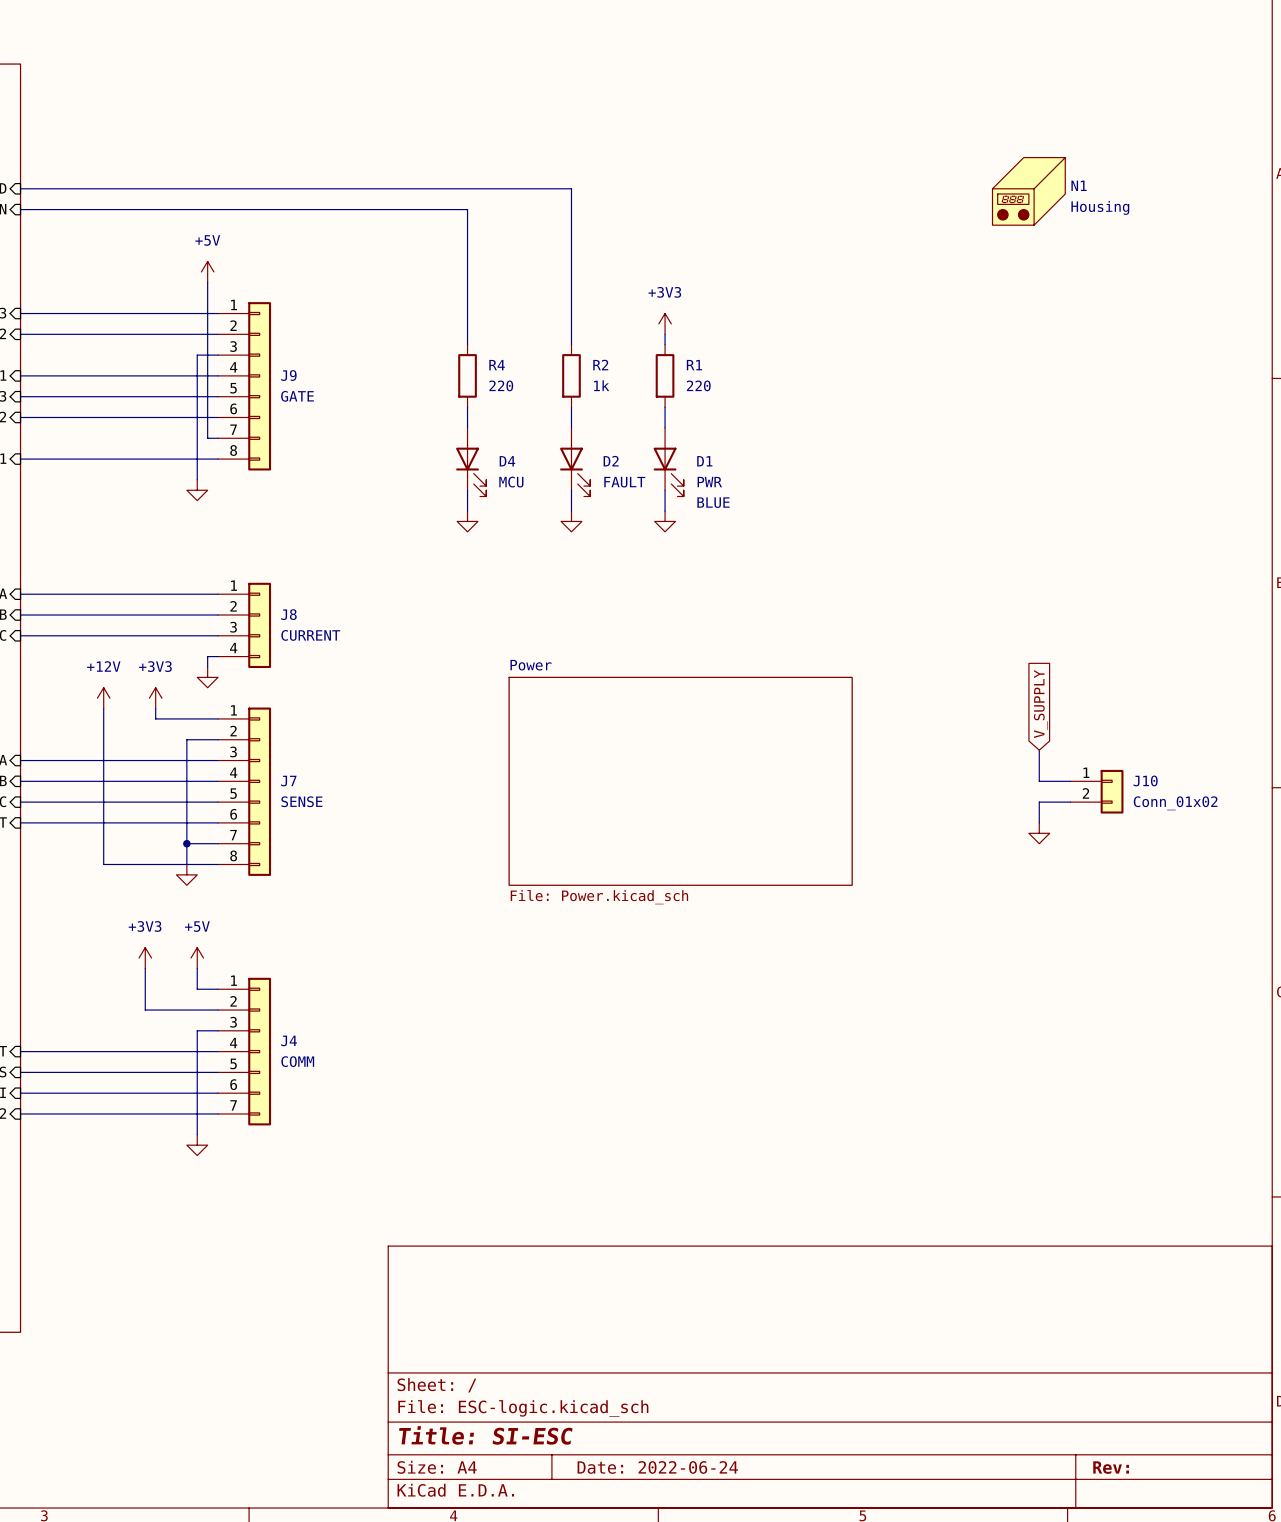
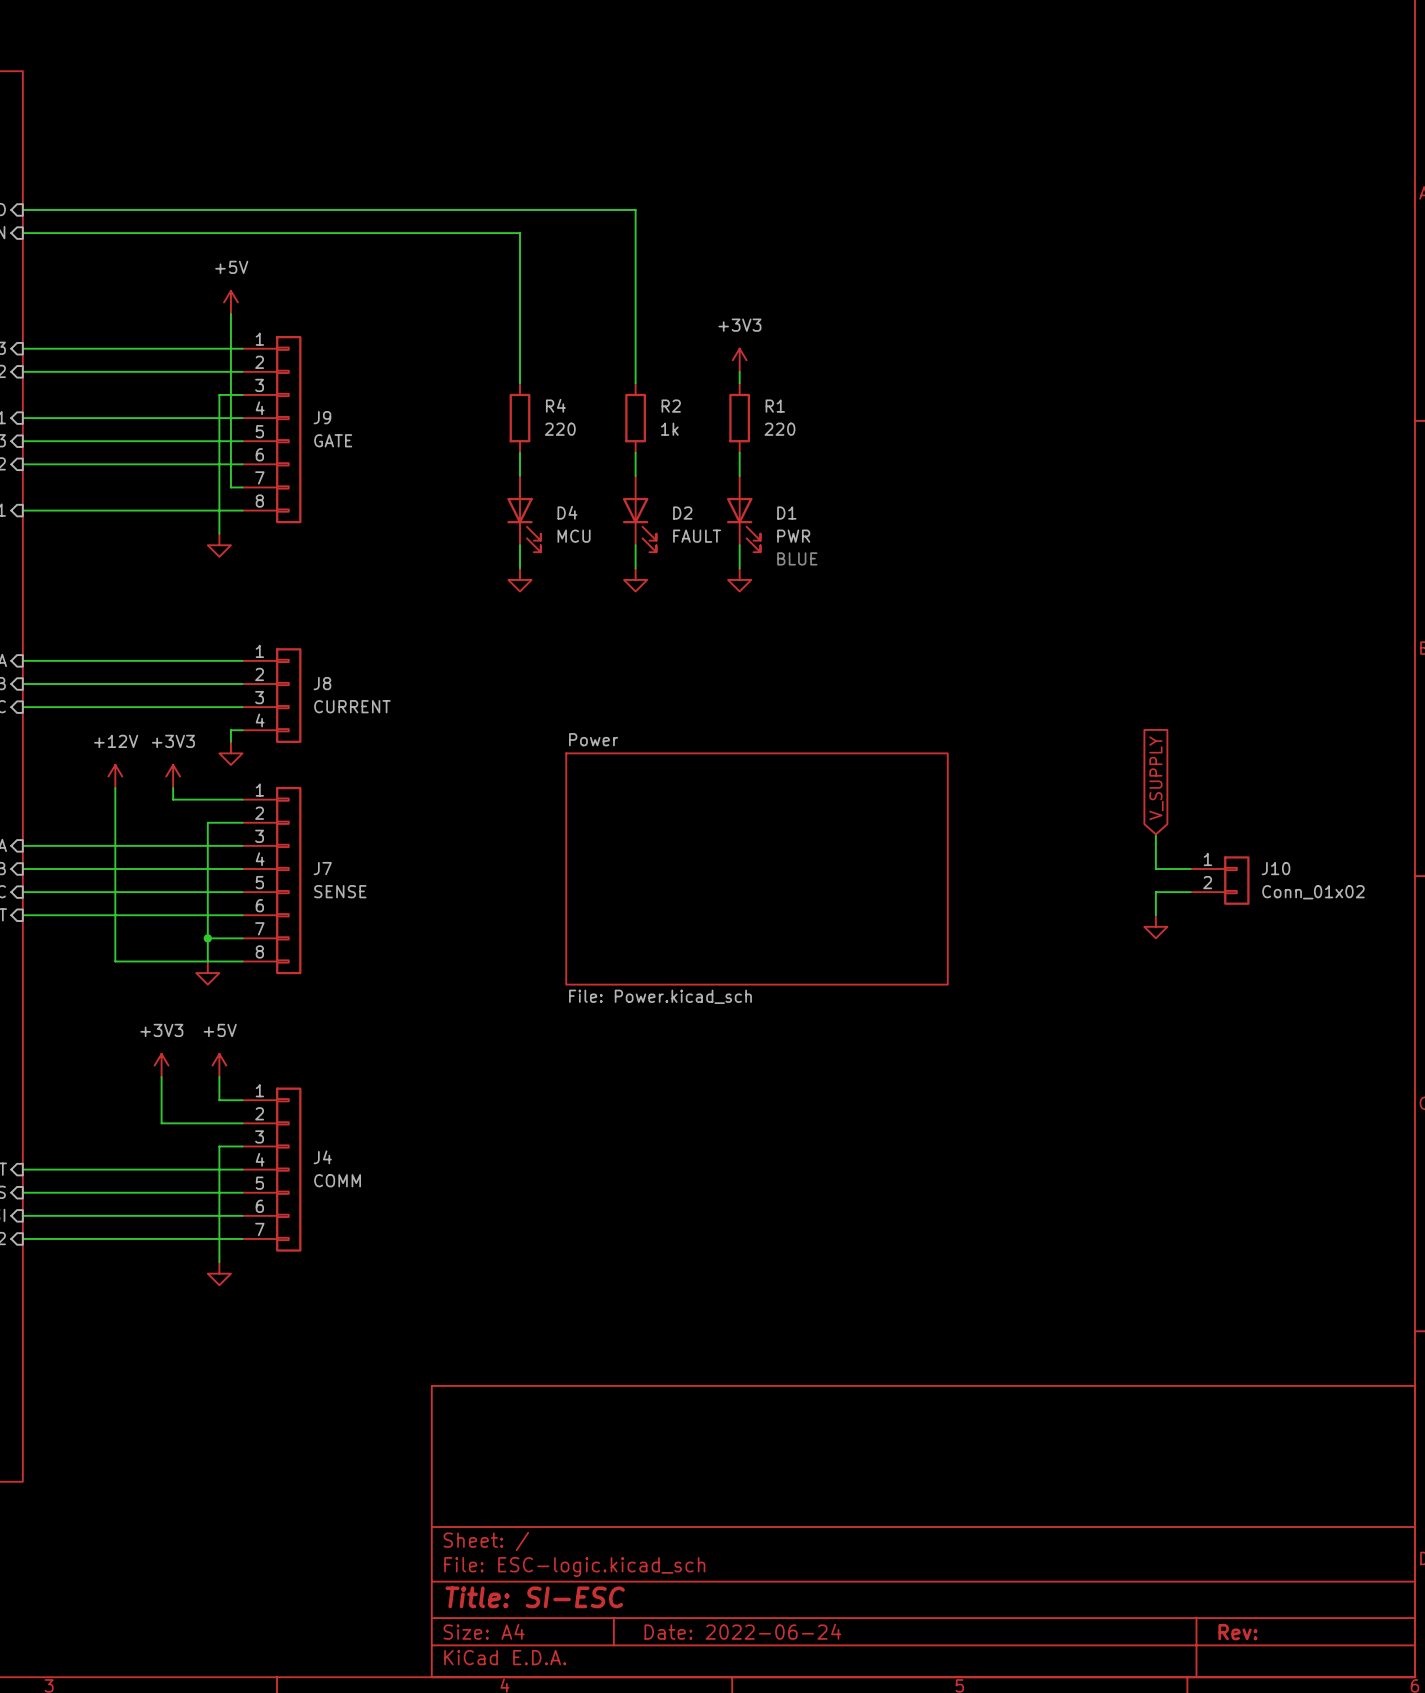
N1: Housing (1028, 191) -> none

